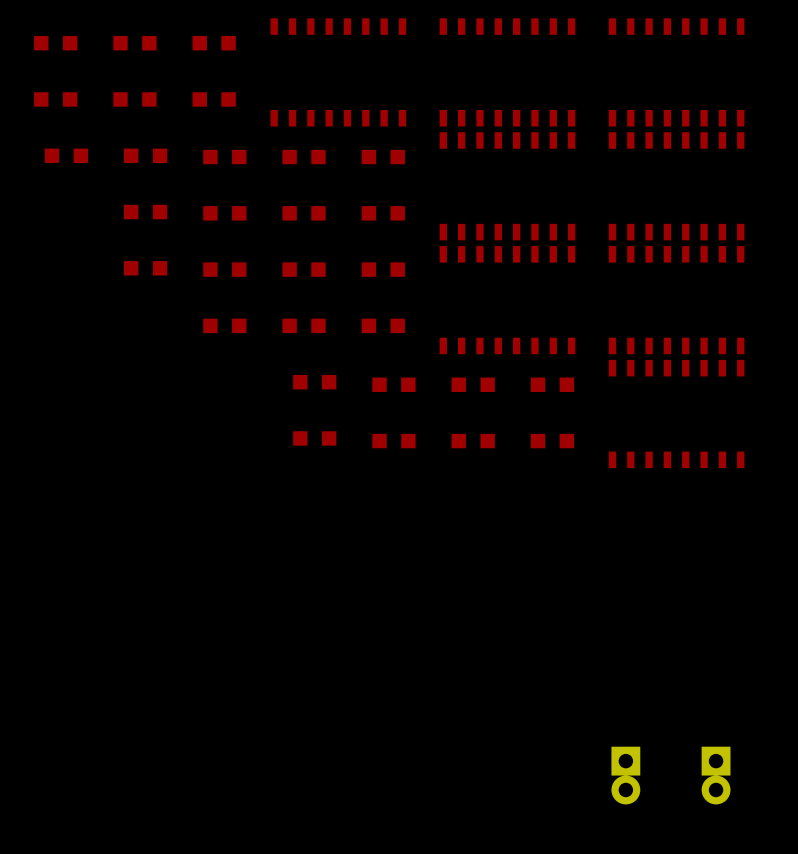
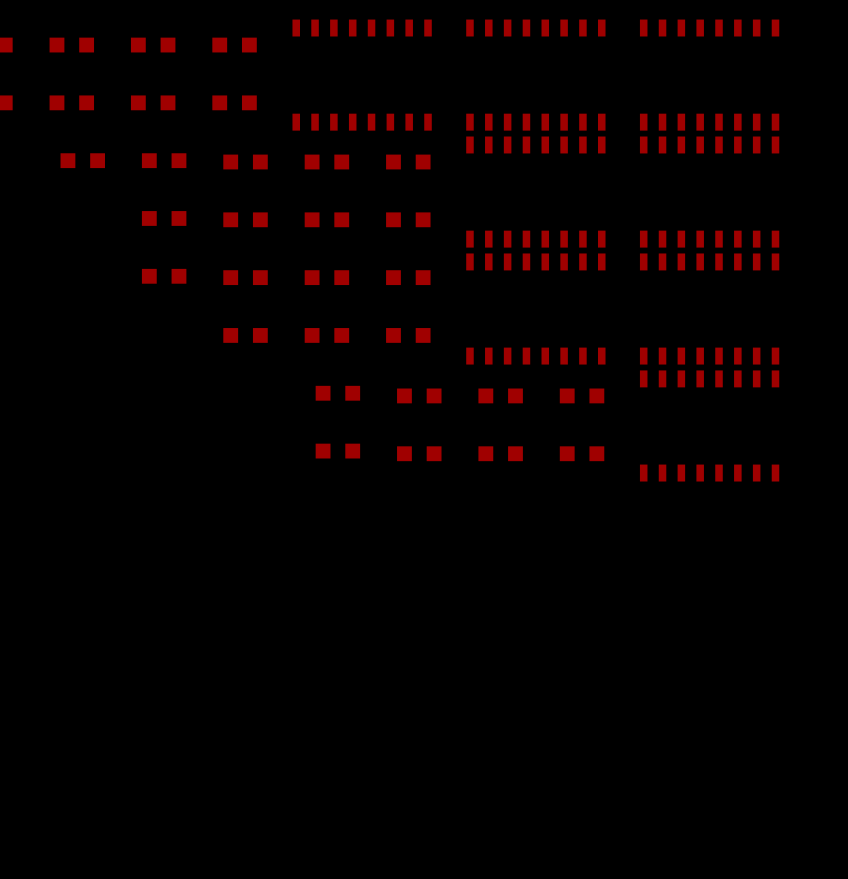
part: (625, 775) -> none
part: (716, 775) -> none

